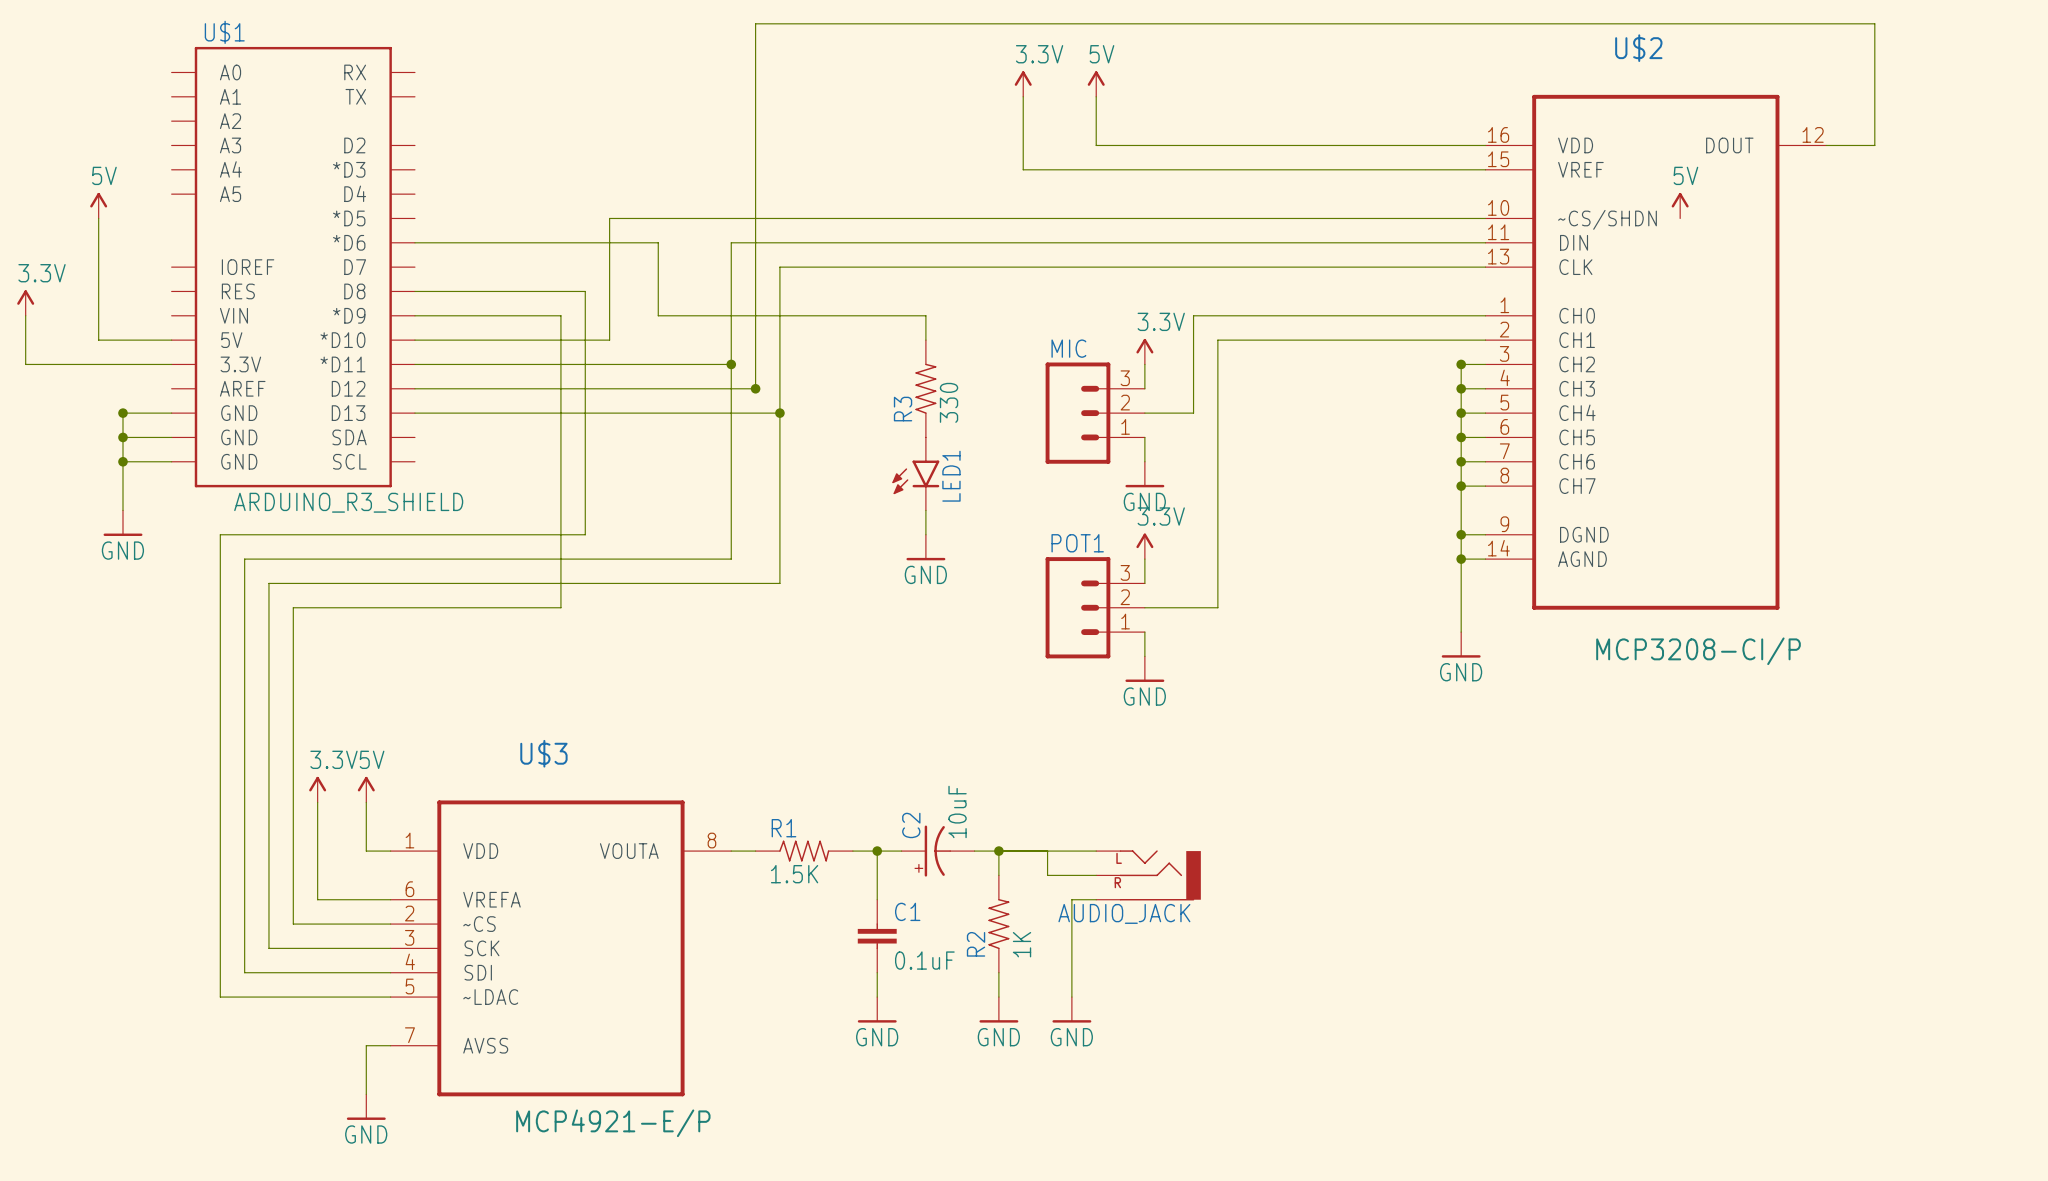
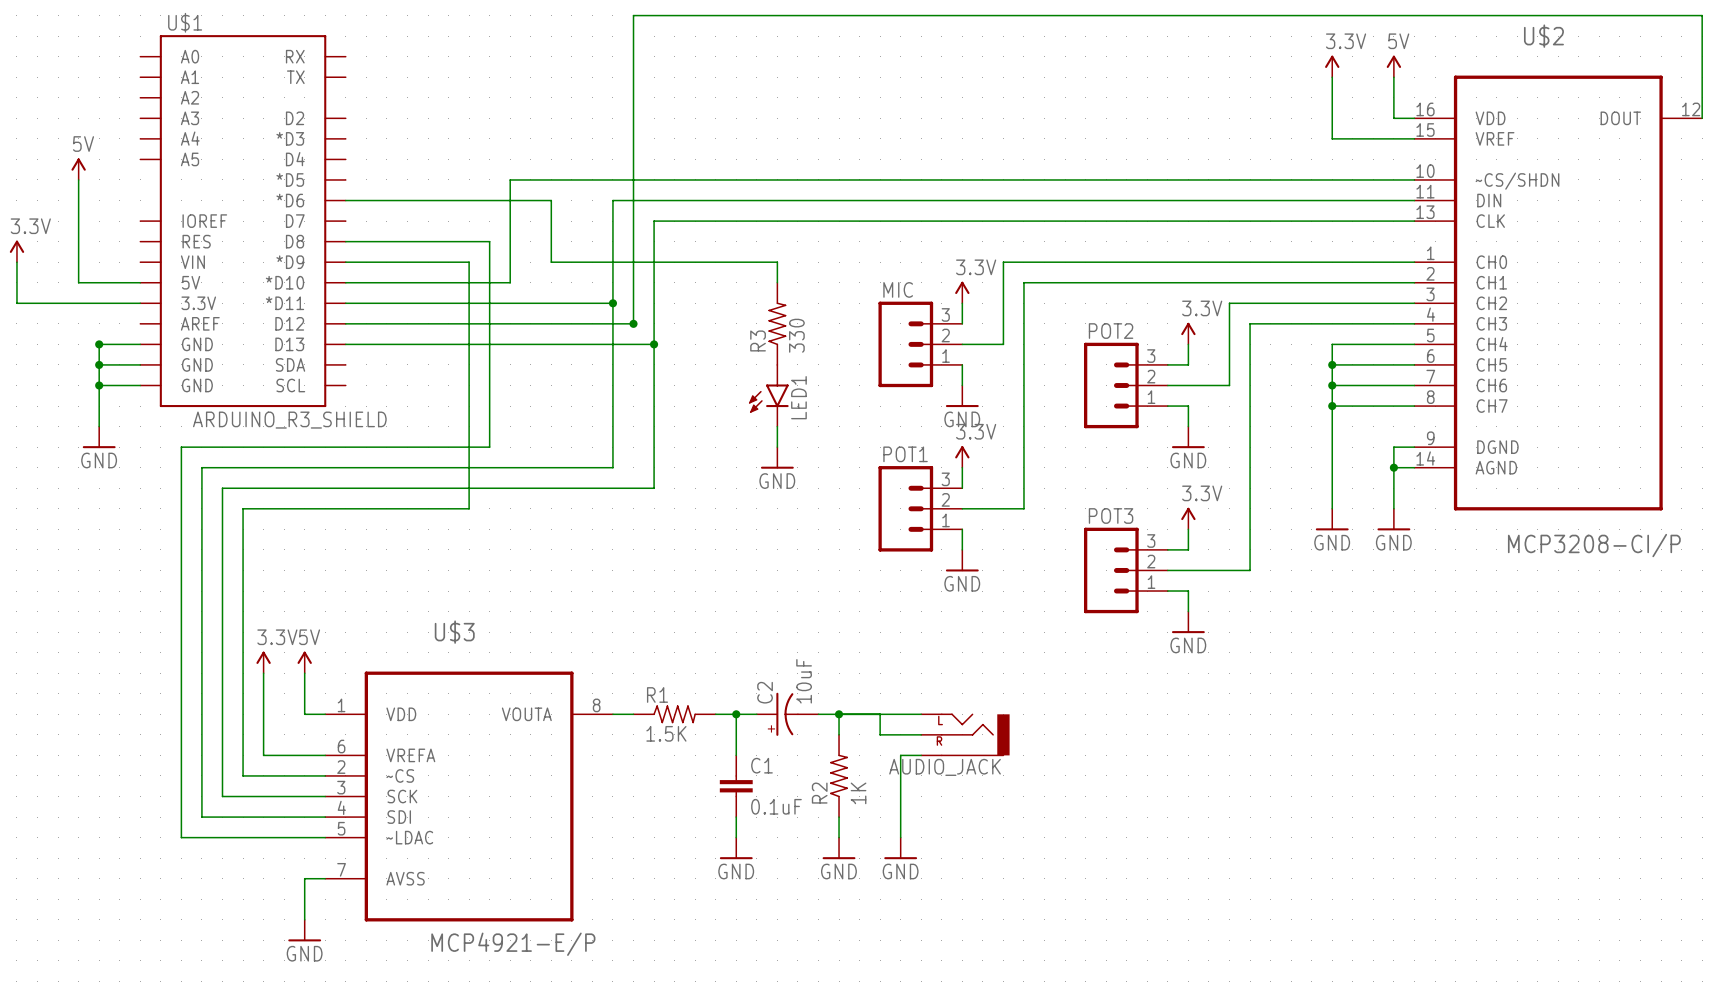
wire: (1874, 23) (1874, 145) (1826, 145) -> (1578, 15) (1702, 15) (1702, 118)
power symbol: 3.3V (1023, 84) -> none
power symbol: 5V (1096, 84) -> none
power symbol: none -> 3.3V (1332, 66)
wire: (1023, 96) (1023, 169) (1485, 169) -> none
wire: (1096, 96) (1096, 145) (1485, 145) -> none
wire: none -> (1332, 77) (1332, 138) (1414, 138)
wire: none -> (1393, 77) (1393, 118) (1414, 118)
power symbol position: 5V (1680, 205) -> 5V (1393, 66)
wire: none -> (1250, 179) (1414, 179)
wire: none -> (1250, 200) (1414, 200)
wire: none -> (1250, 221) (1414, 221)
wire: none -> (1250, 262) (1414, 262)
wire: none -> (1250, 282) (1414, 282)
U$2 position: (1655, 352) -> (1558, 293)
junction: (1461, 364) -> none
wire: none -> (1250, 303) (1414, 303)
wire: (1461, 388) (1485, 388) -> none
junction: (1461, 388) -> none
wire: none -> (1414, 323) (1250, 323) (1250, 570) (1167, 570)
power symbol: none -> 3.3V (1188, 333)
wire: none -> (1188, 344) (1188, 364) (1167, 364)
wire: (1461, 413) (1485, 413) -> none
junction: (1461, 413) -> none
wire: none -> (1414, 344) (1332, 344) (1332, 508)
wire: (1461, 437) (1485, 437) -> none
junction: (1461, 437) -> none
wire: none -> (1332, 364) (1414, 364)
junction: none -> (1332, 364)
POT2: none -> (1125, 385)
wire: none -> (1167, 385) (1229, 385)
junction: (1461, 461) -> none
wire: (1485, 461) (1461, 461) (1461, 632) -> none
wire: none -> (1332, 385) (1414, 385)
junction: none -> (1332, 385)
wire: none -> (1167, 406) (1188, 406) (1188, 426)
wire: (1461, 486) (1485, 486) -> none
junction: (1461, 486) -> none
wire: none -> (1332, 406) (1414, 406)
junction: none -> (1332, 406)
power symbol: none -> GND (1188, 437)
wire: (1461, 534) (1485, 534) -> none
junction: (1461, 534) -> none
wire: none -> (1414, 447) (1393, 447) (1393, 508)
wire: (1461, 559) (1485, 559) -> (1393, 467) (1414, 467)
junction: (1461, 559) -> none
junction: none -> (1393, 467)
power symbol: none -> 3.3V (1188, 518)
power symbol: none -> GND (1332, 519)
power symbol: none -> GND (1393, 519)
wire: none -> (1188, 529) (1188, 549) (1167, 549)
power symbol: GND (1461, 644) -> none
POT3: none -> (1125, 570)
wire: none -> (1167, 591) (1188, 591) (1188, 611)
power symbol: none -> GND (1188, 622)

